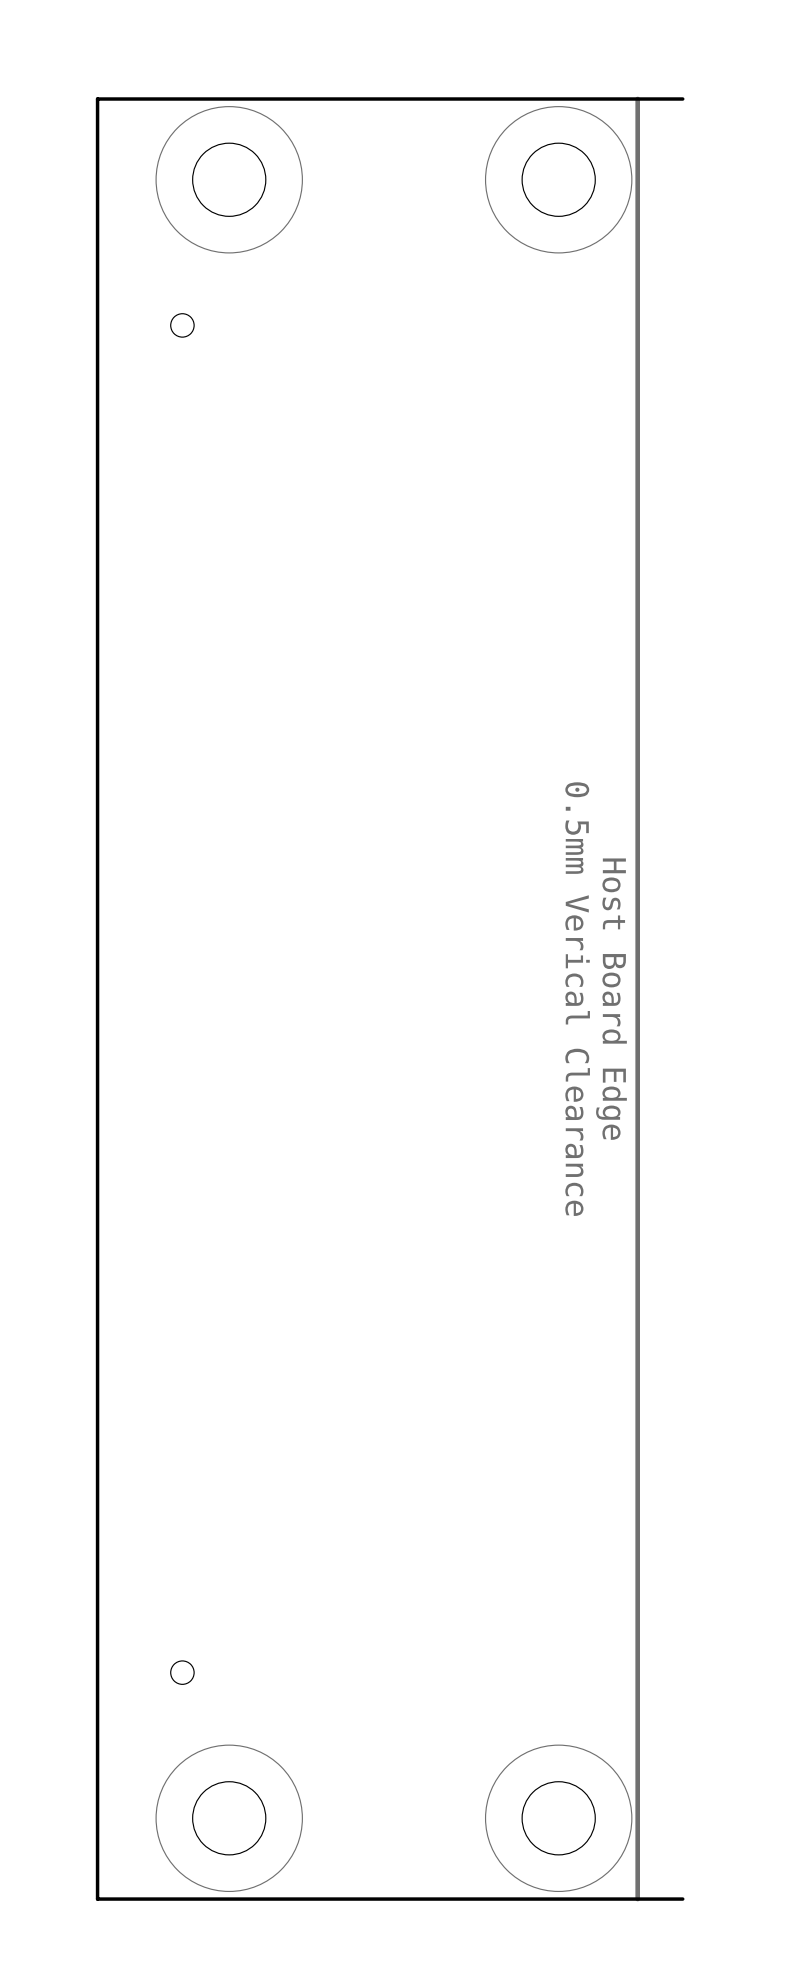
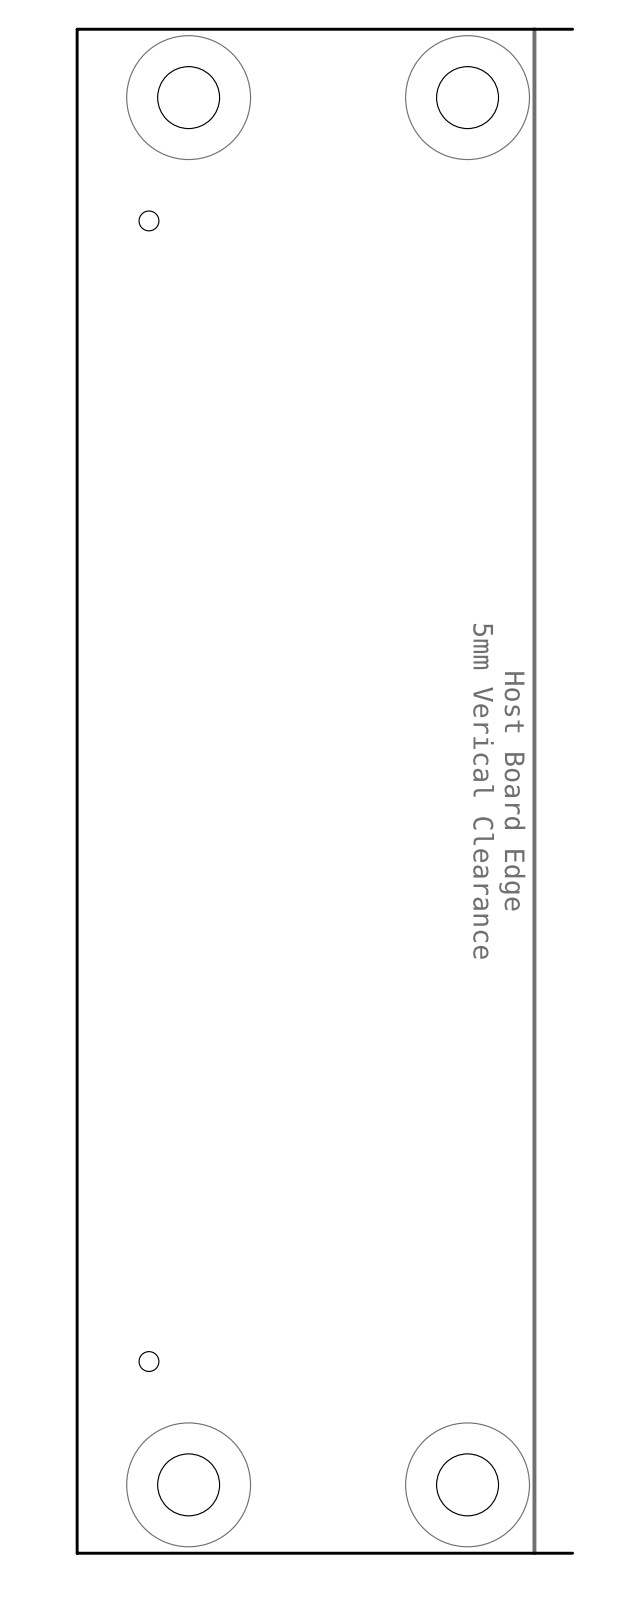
text: 0.5mm Verical Clearance (577, 999) -> 5mm Verical Clearance (483, 791)

